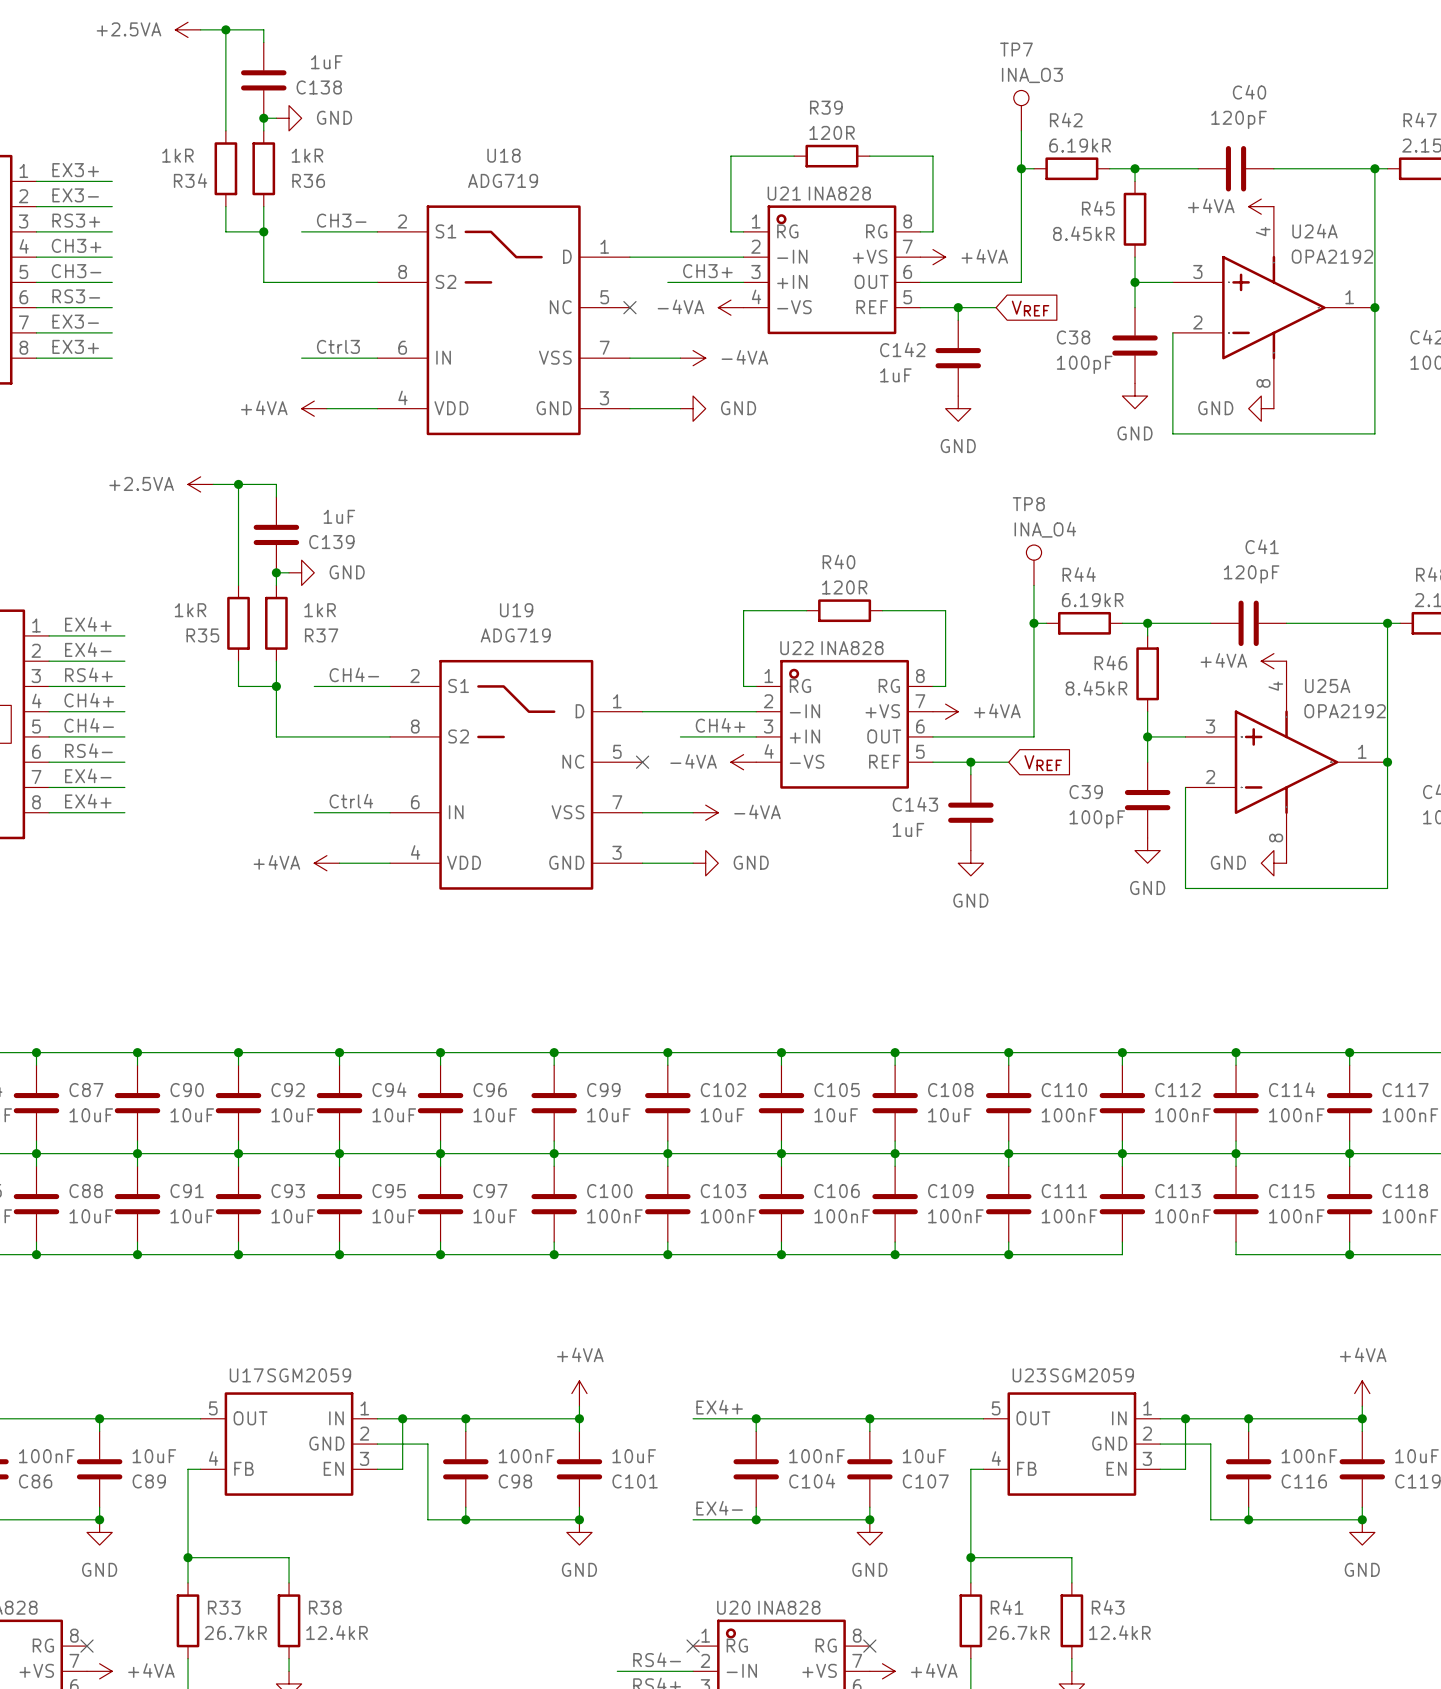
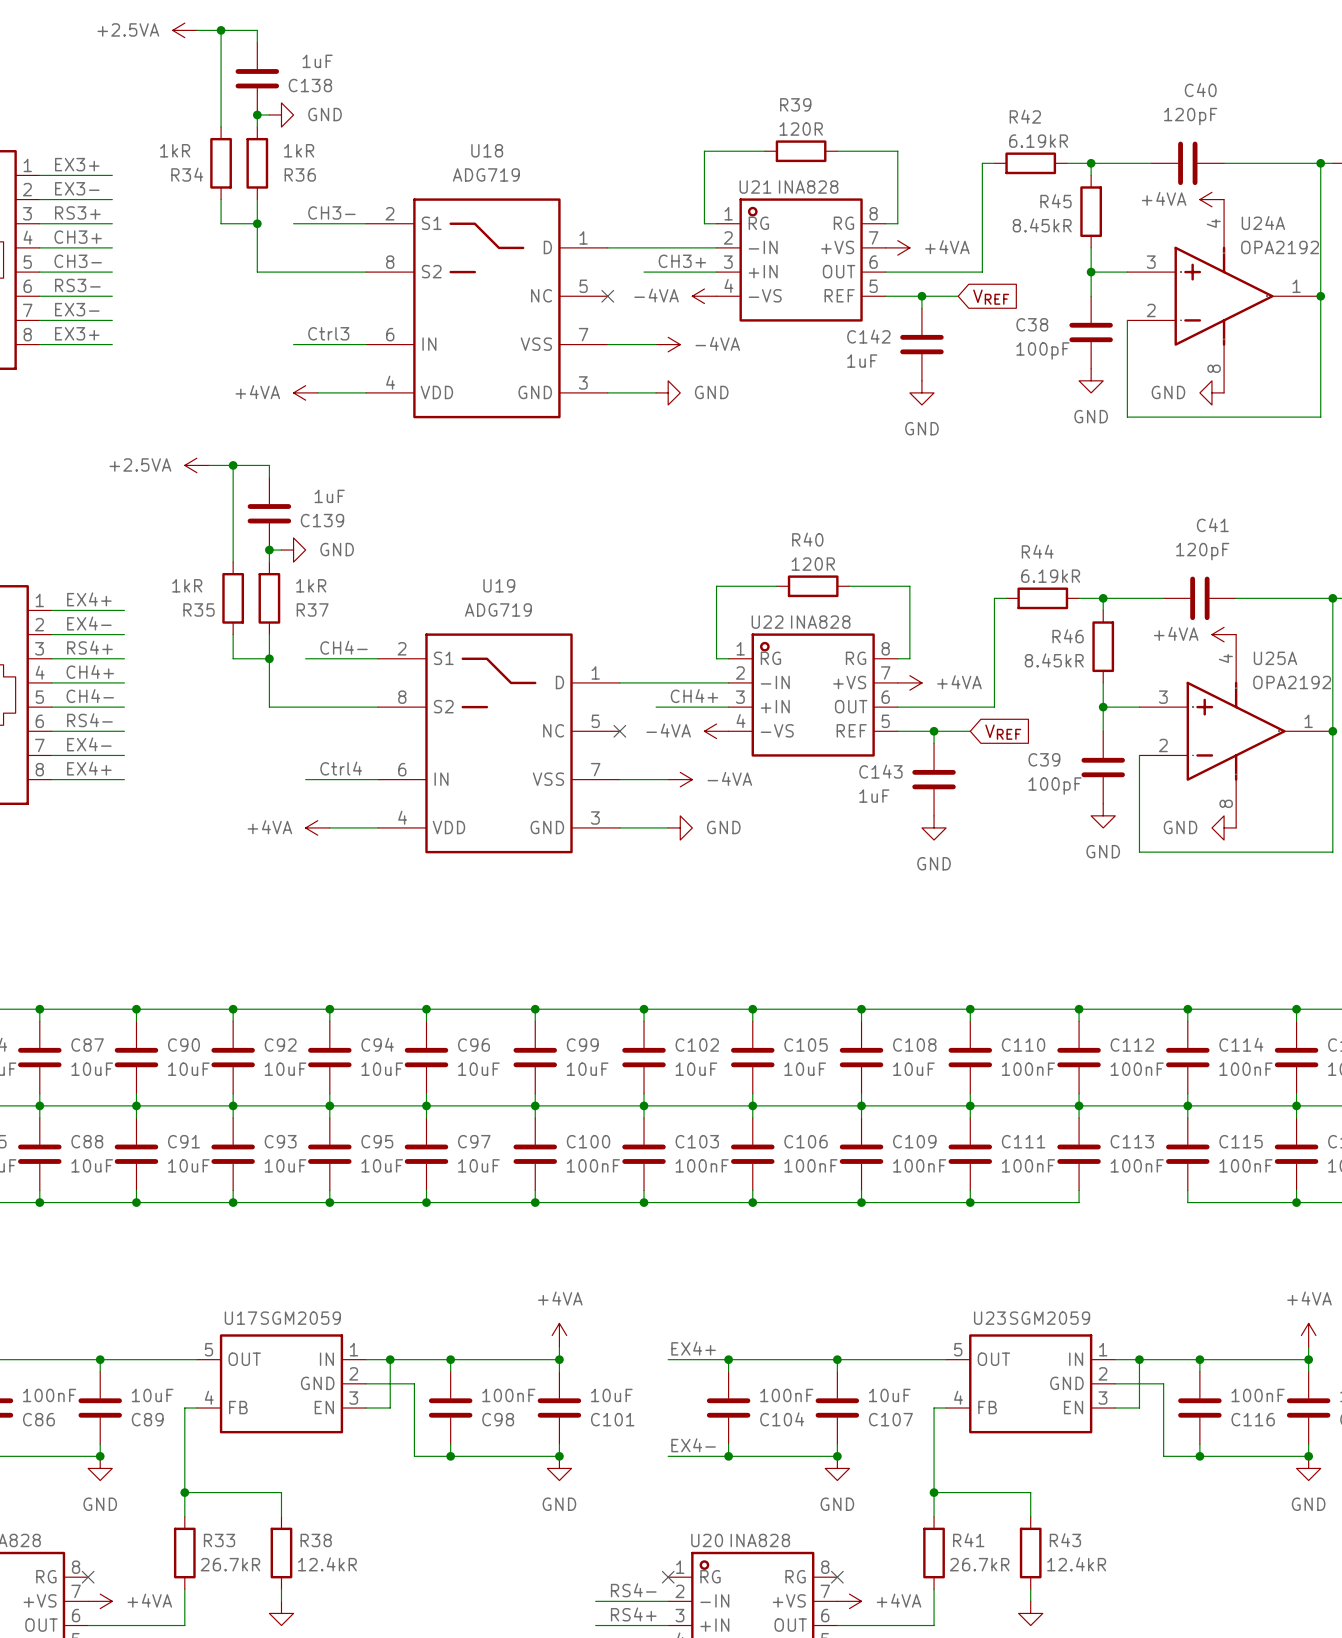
TP7: INA_O3 (1021, 110) -> none
wire: (1021, 130) (1021, 168) -> none
junction: (1021, 168) -> none
TP8: INA_O4 (1033, 565) -> none
wire: (1033, 585) (1033, 623) -> none
junction: (1033, 623) -> none

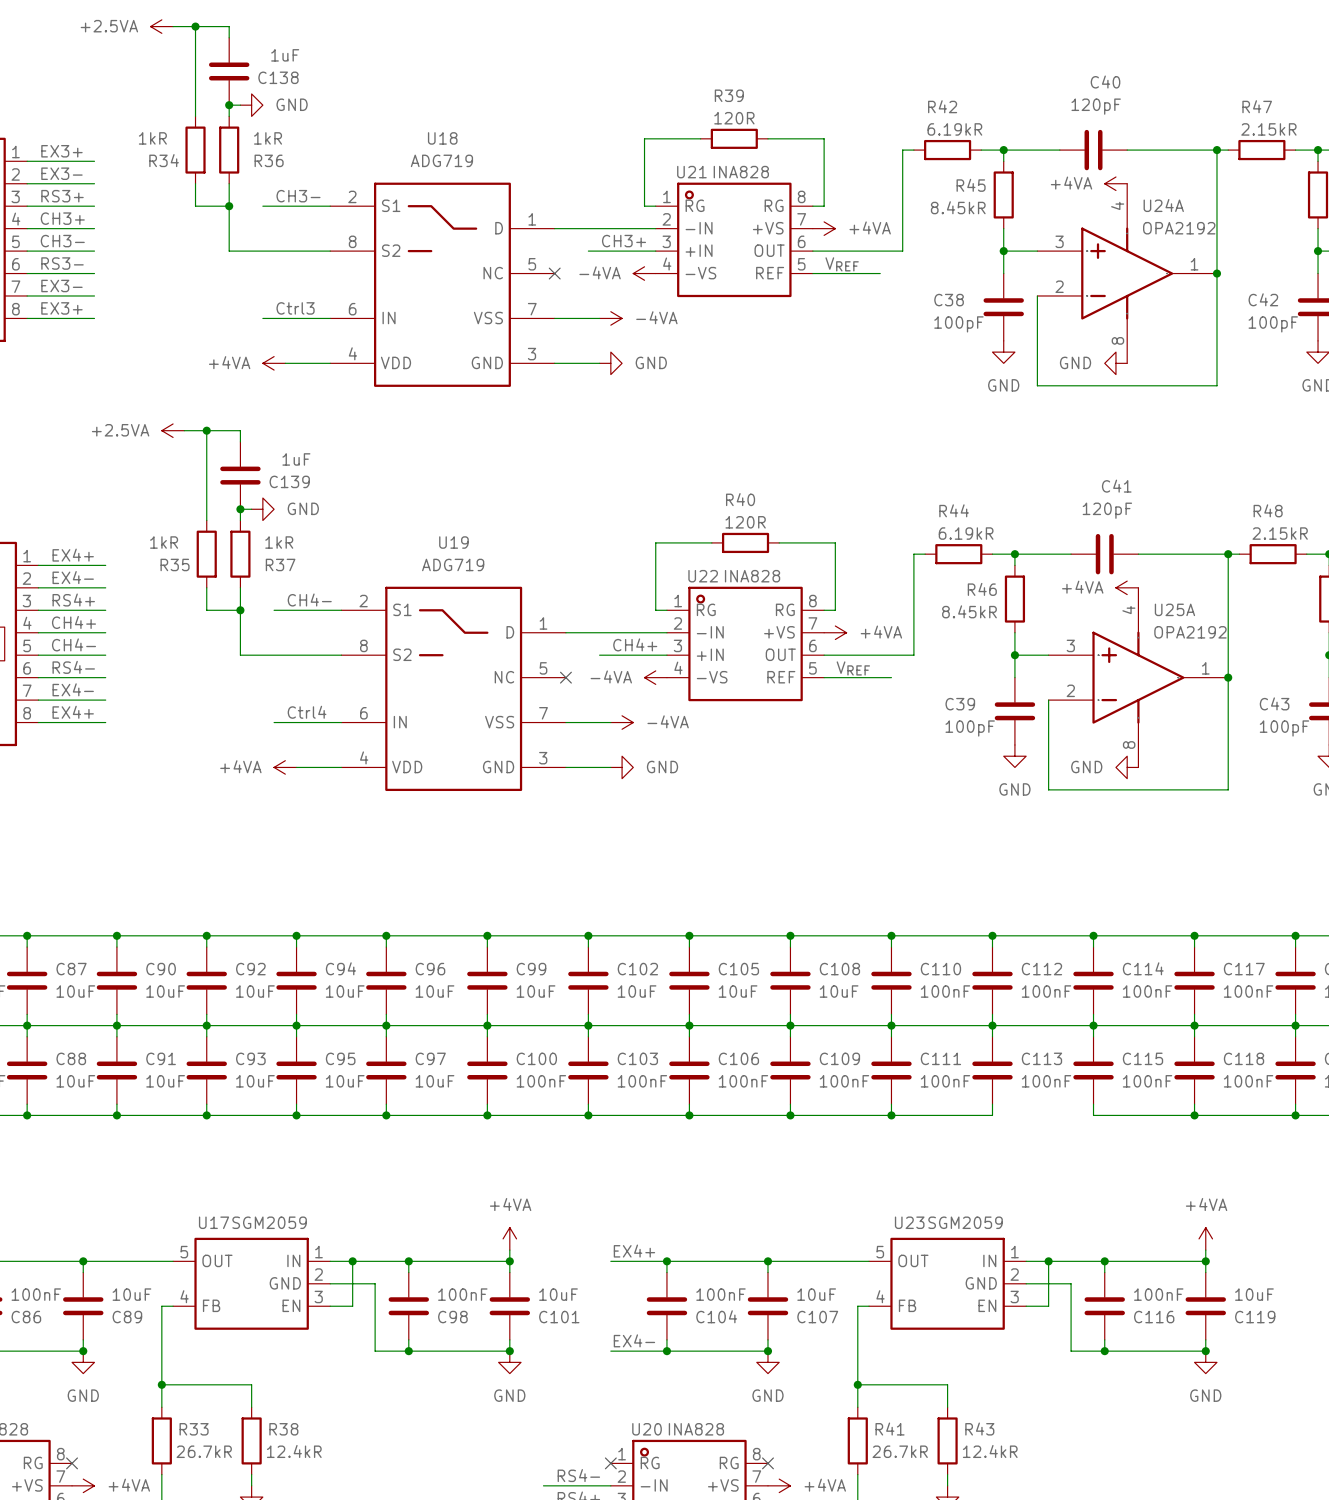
label: none -> VREF (842, 264)
wire: (921, 296) (921, 308) -> none
junction: (921, 296) -> none
global label: VREF (991, 297) -> none
C142: 1uF (921, 344) -> none
power symbol: GND (921, 392) -> none
label: none -> VREF (853, 668)
wire: (934, 731) (934, 743) -> none
junction: (934, 731) -> none
global label: VREF (1003, 732) -> none
C143: 1uF (934, 779) -> none
power symbol: GND (934, 827) -> none

